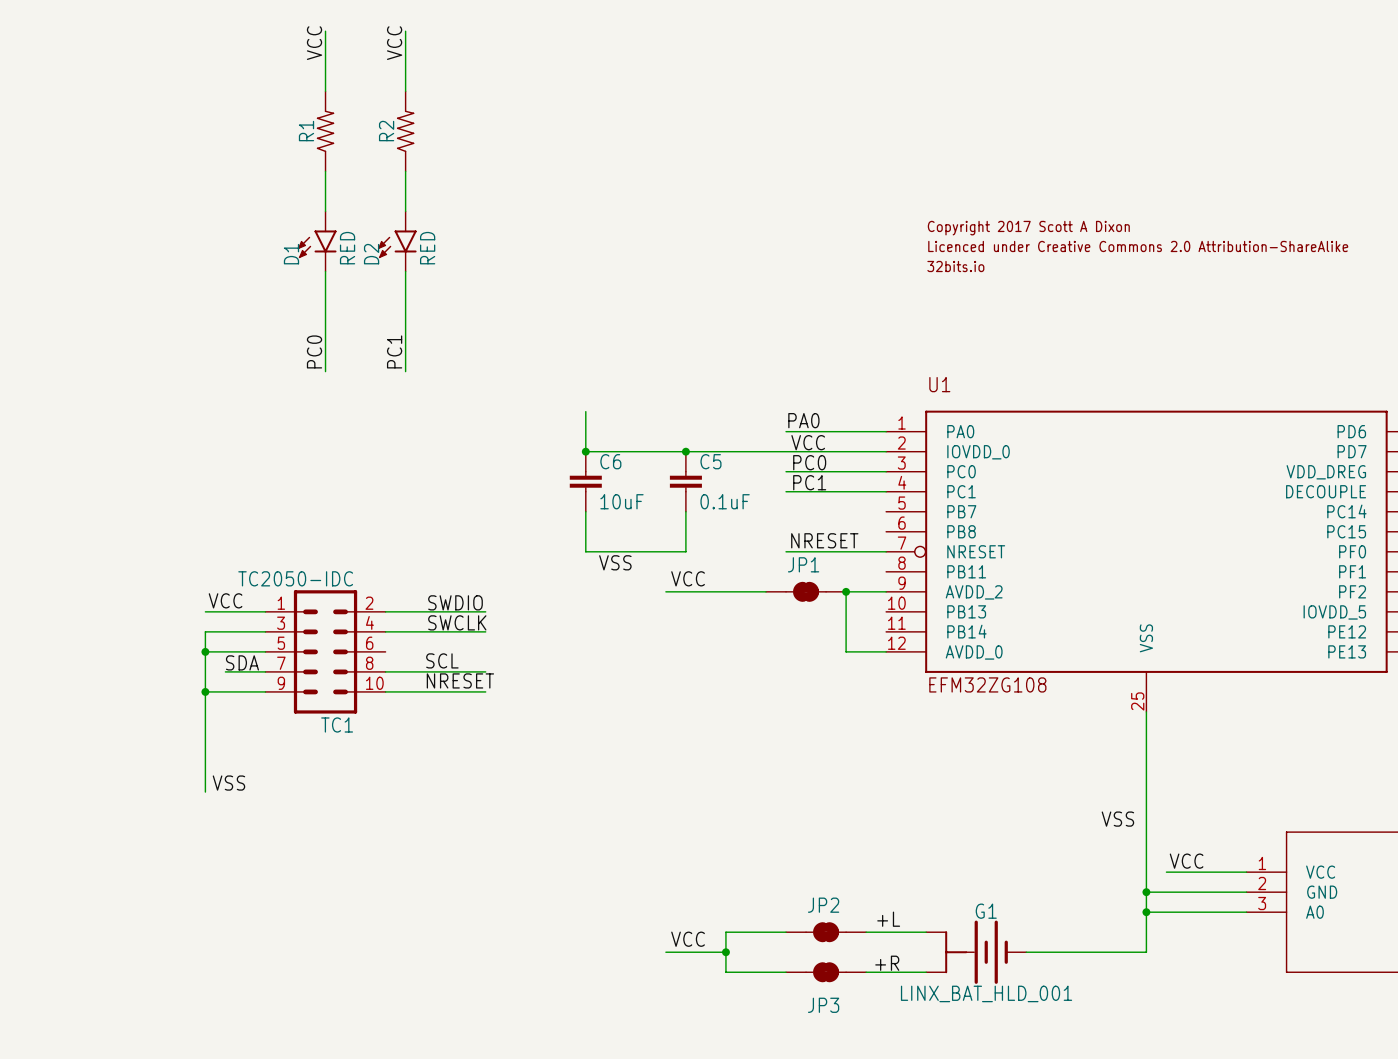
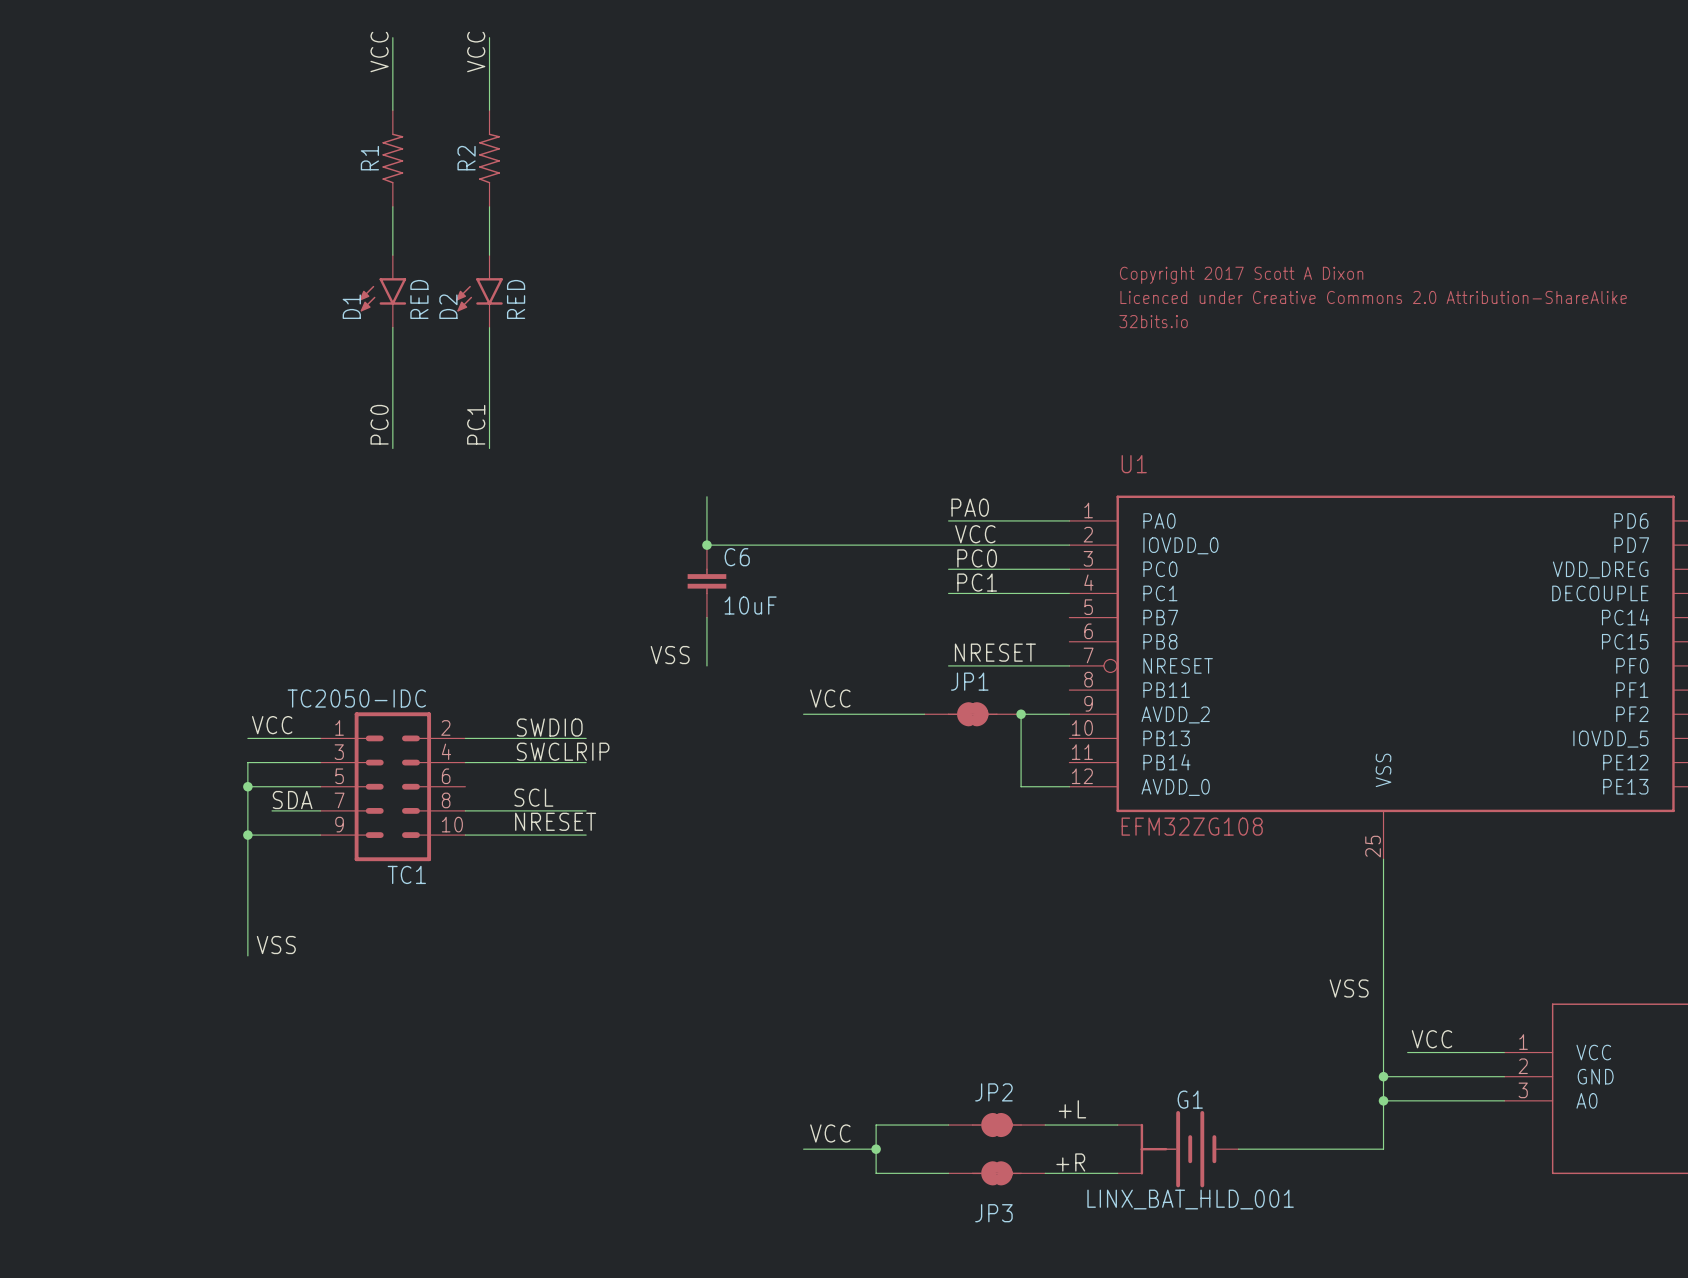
junction: (685, 451) -> none
C5: 0.1uF (685, 481) -> none
wire: (685, 511) (685, 551) (585, 551) -> none
label position: VSS (615, 562) -> VSS (670, 655)
label: SWCLK (457, 622) -> SWCLRIP (563, 751)

